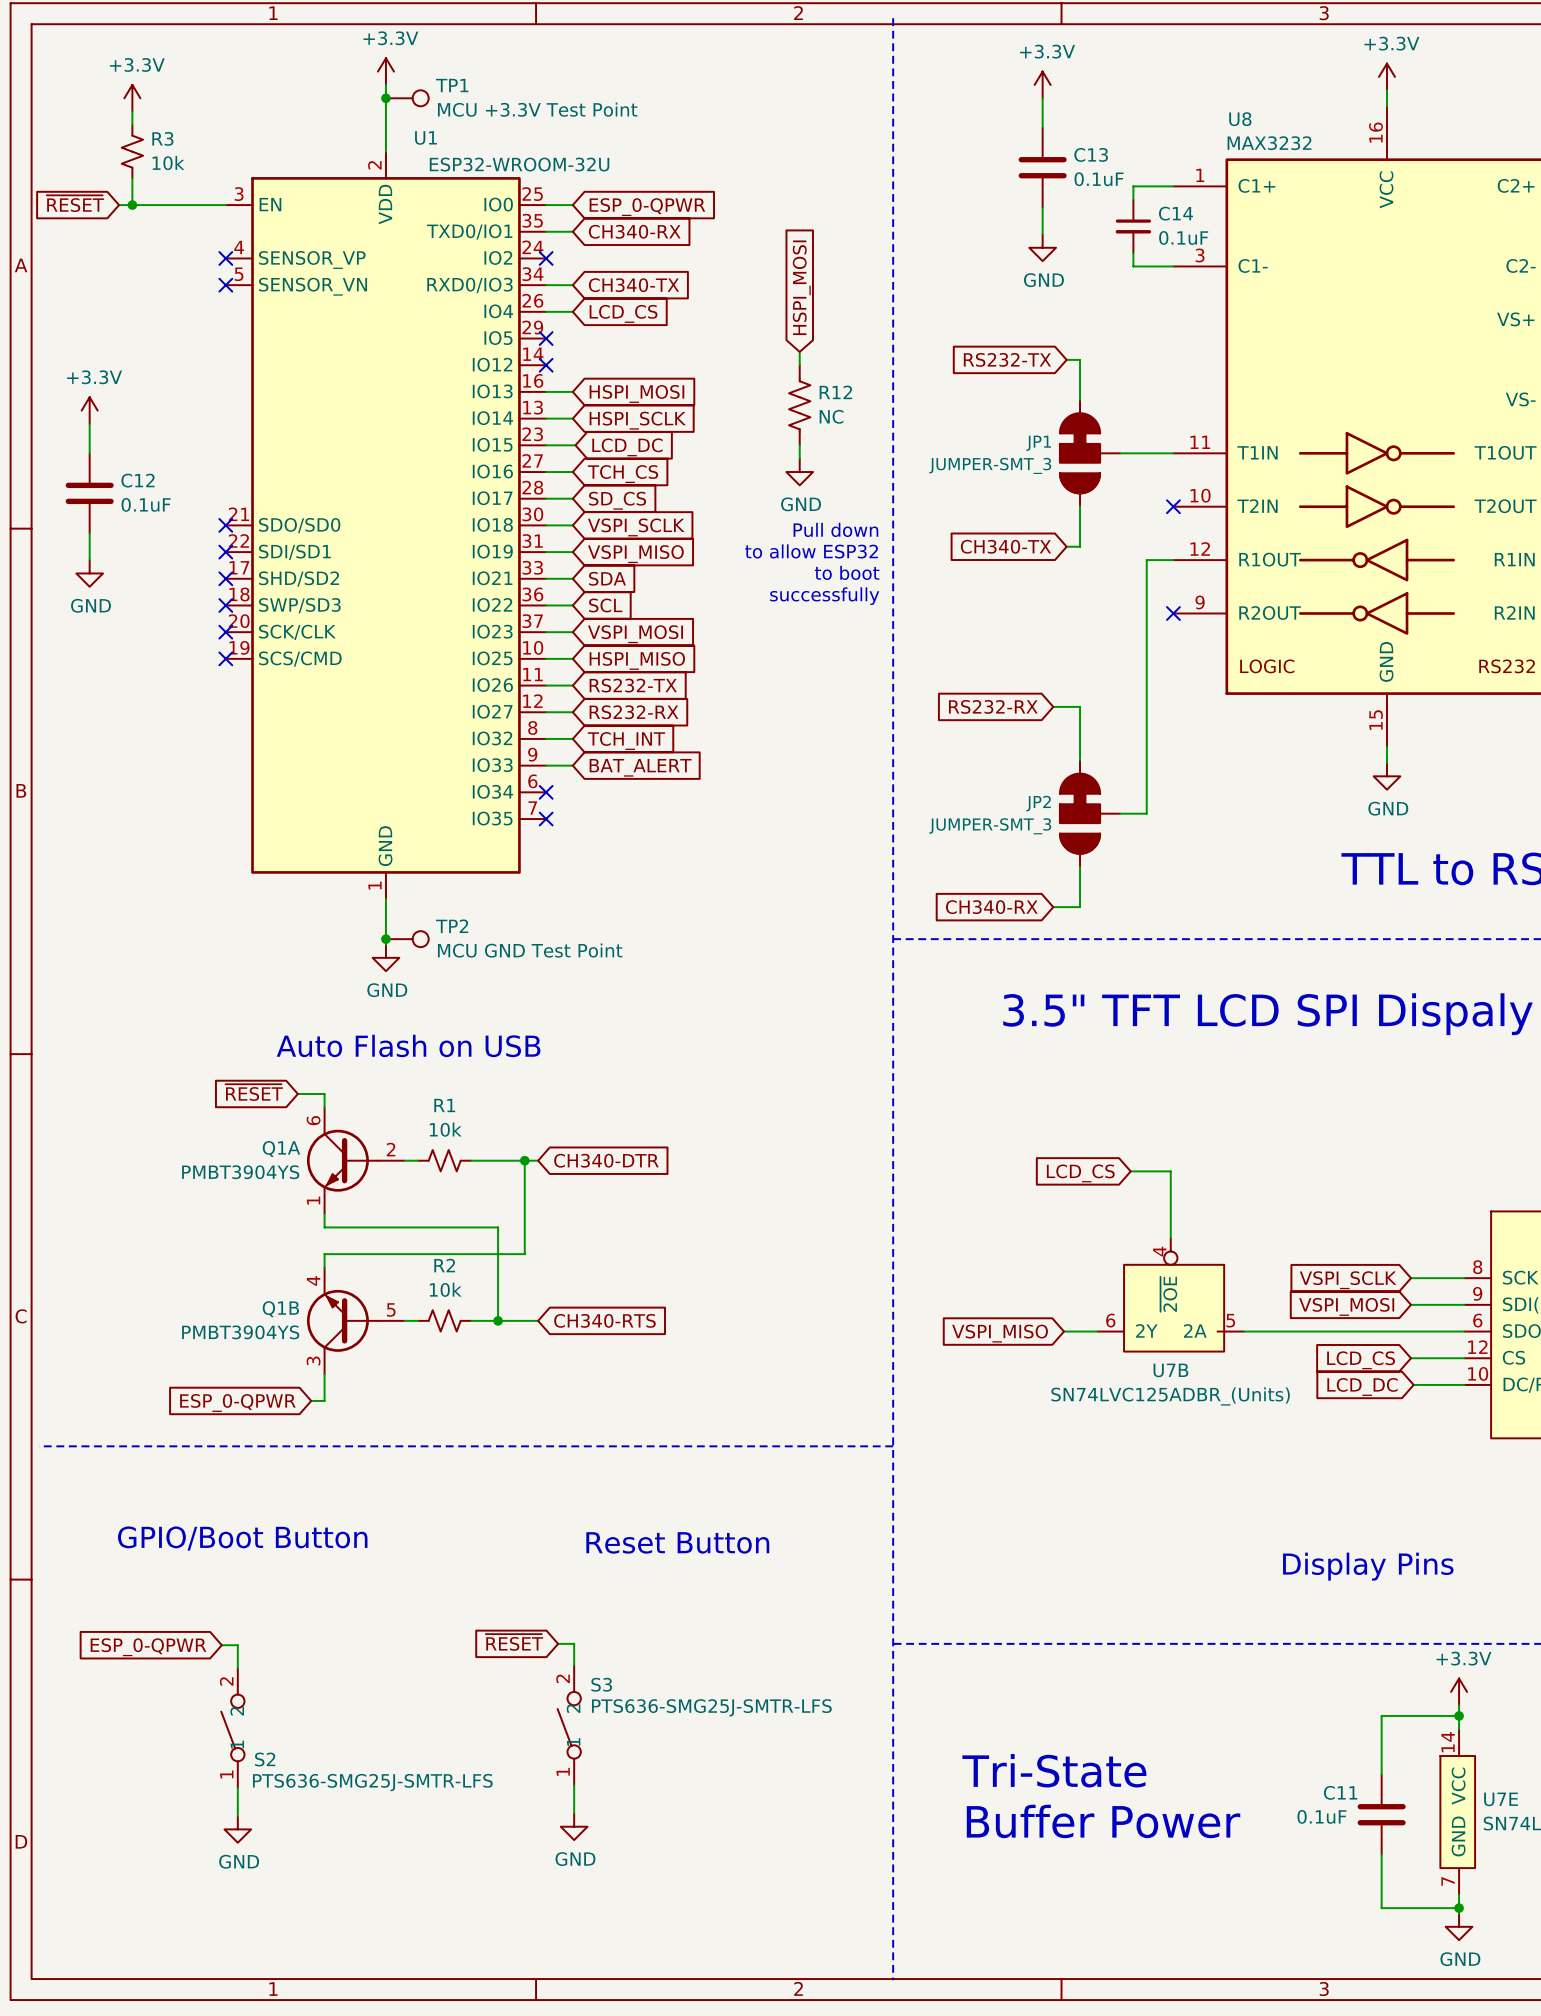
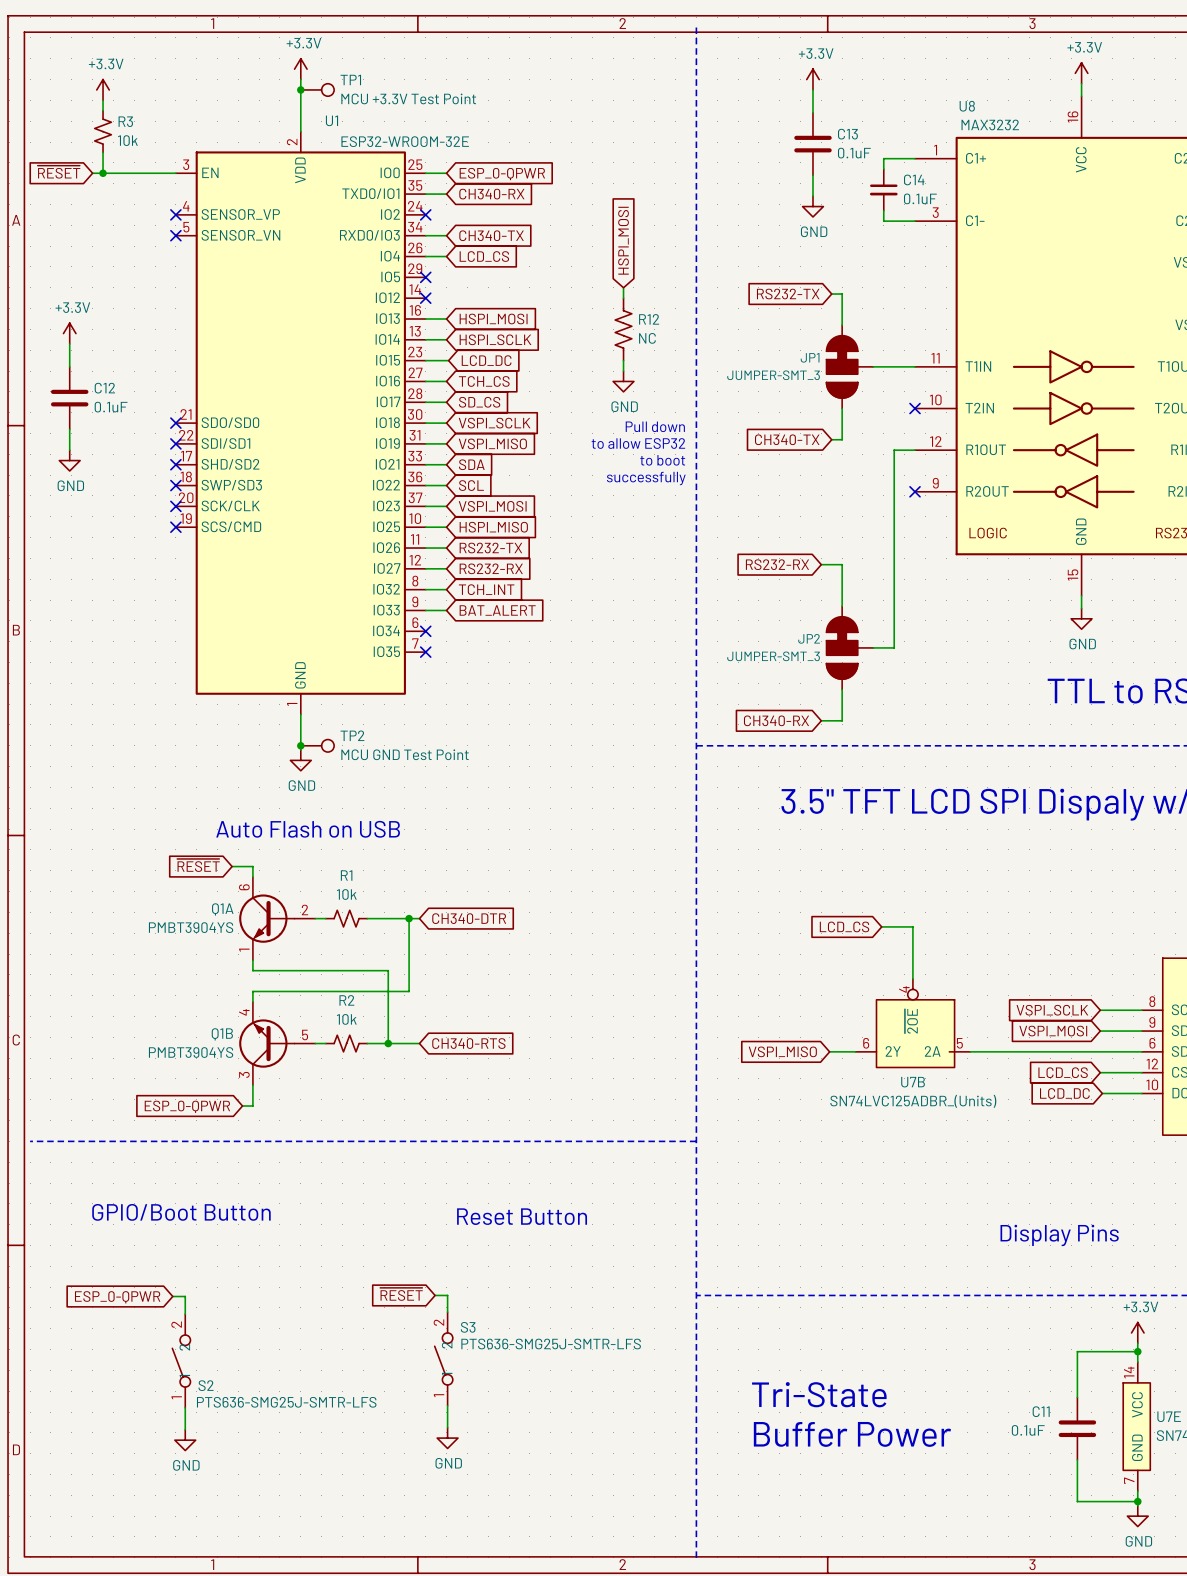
U1 value: ESP32-WROOM-32U (519, 164) -> ESP32-WROOM-32E (405, 141)

